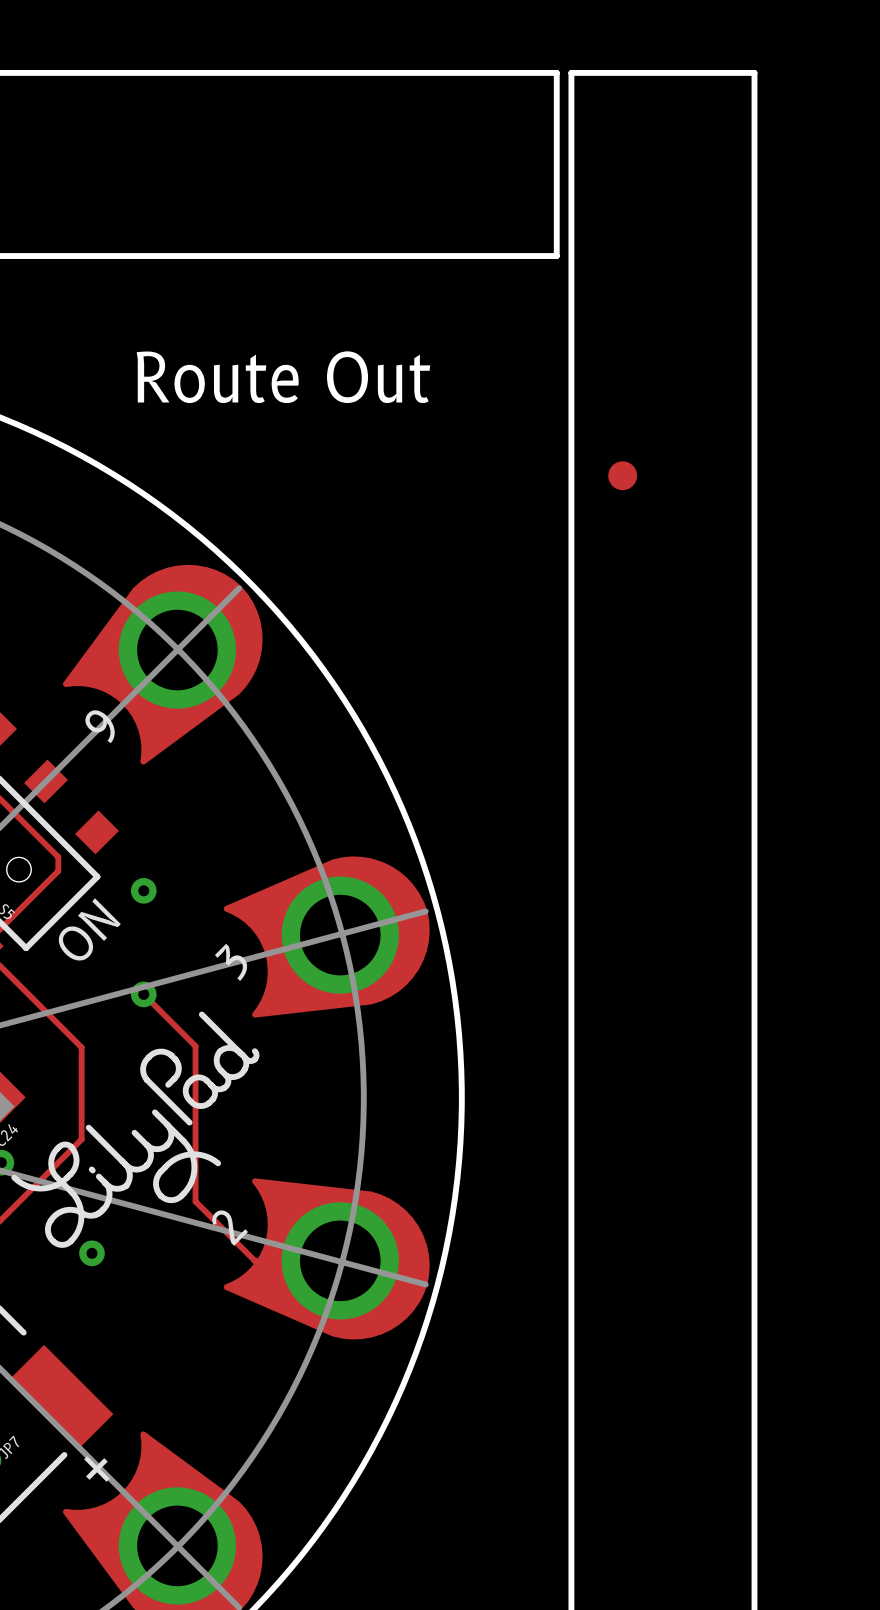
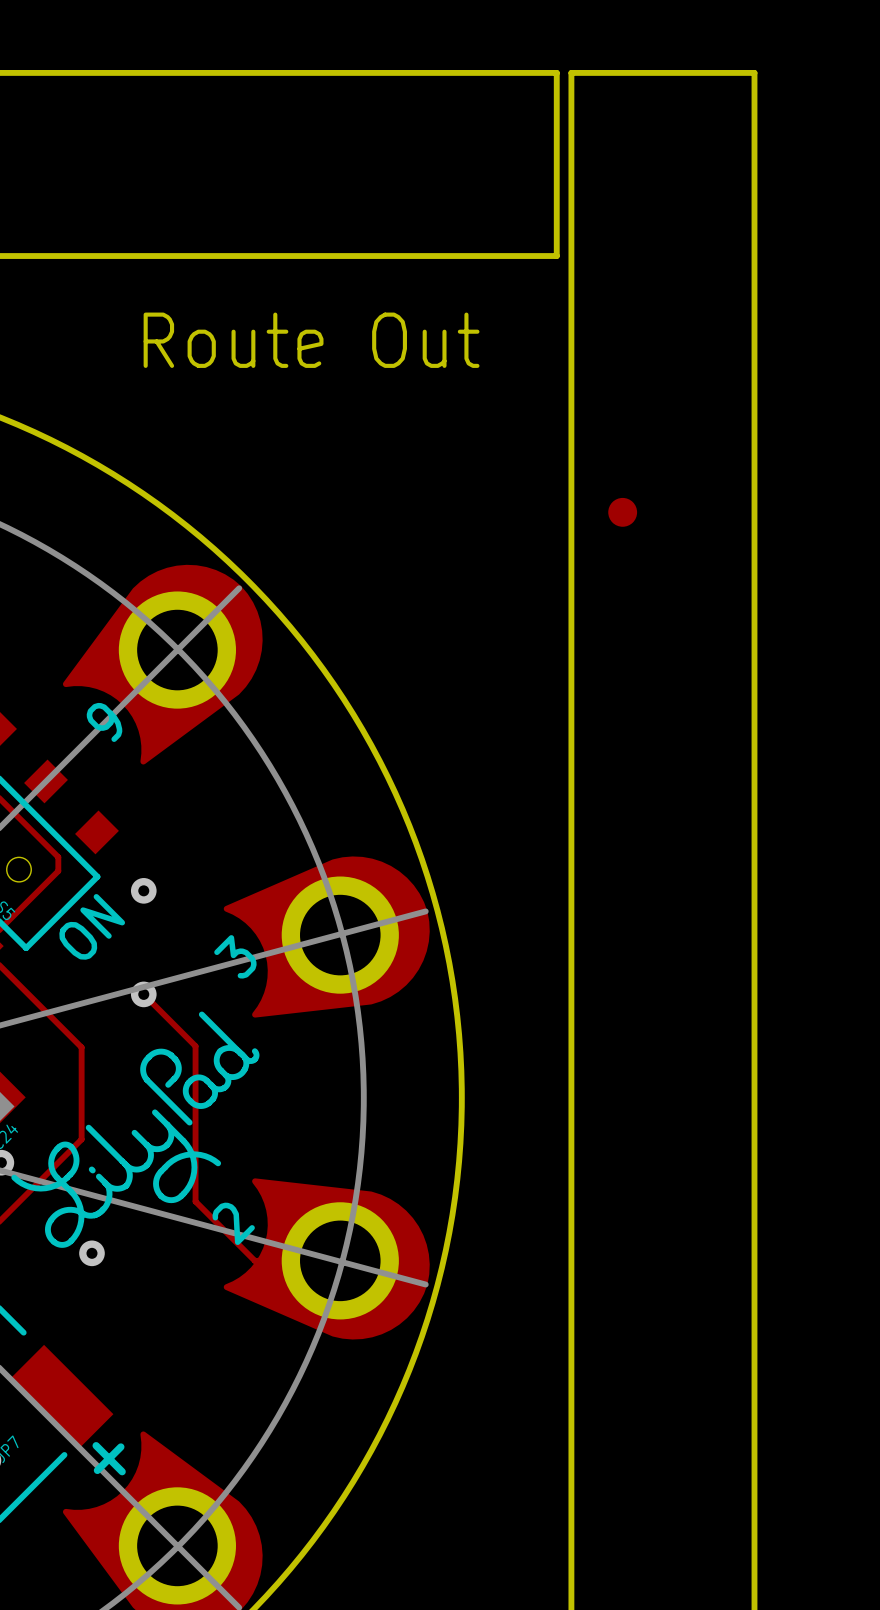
text position: Route Out (283, 377) -> Route Out (311, 340)
part position: (622, 475) -> (622, 512)

